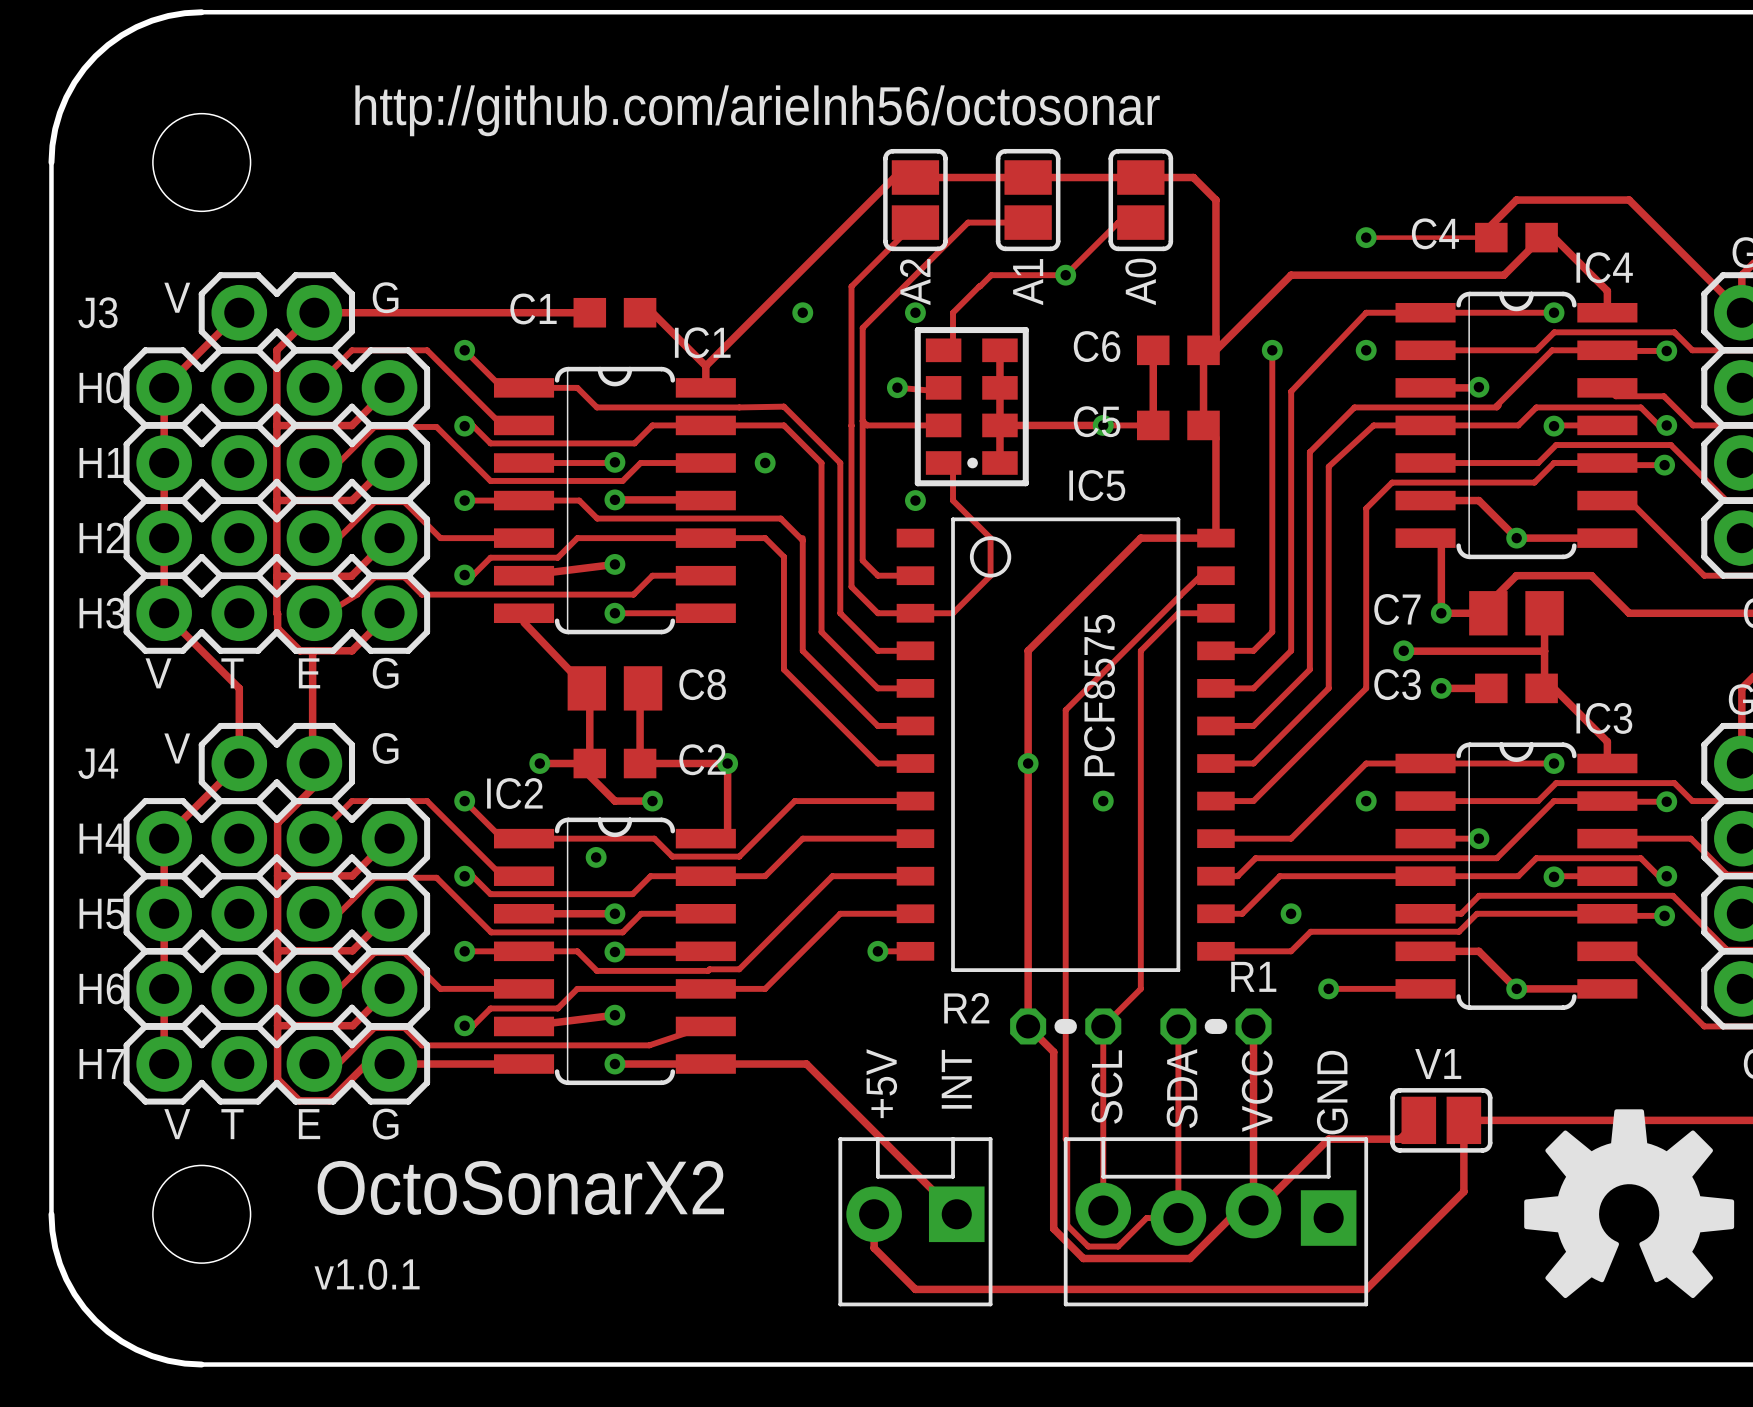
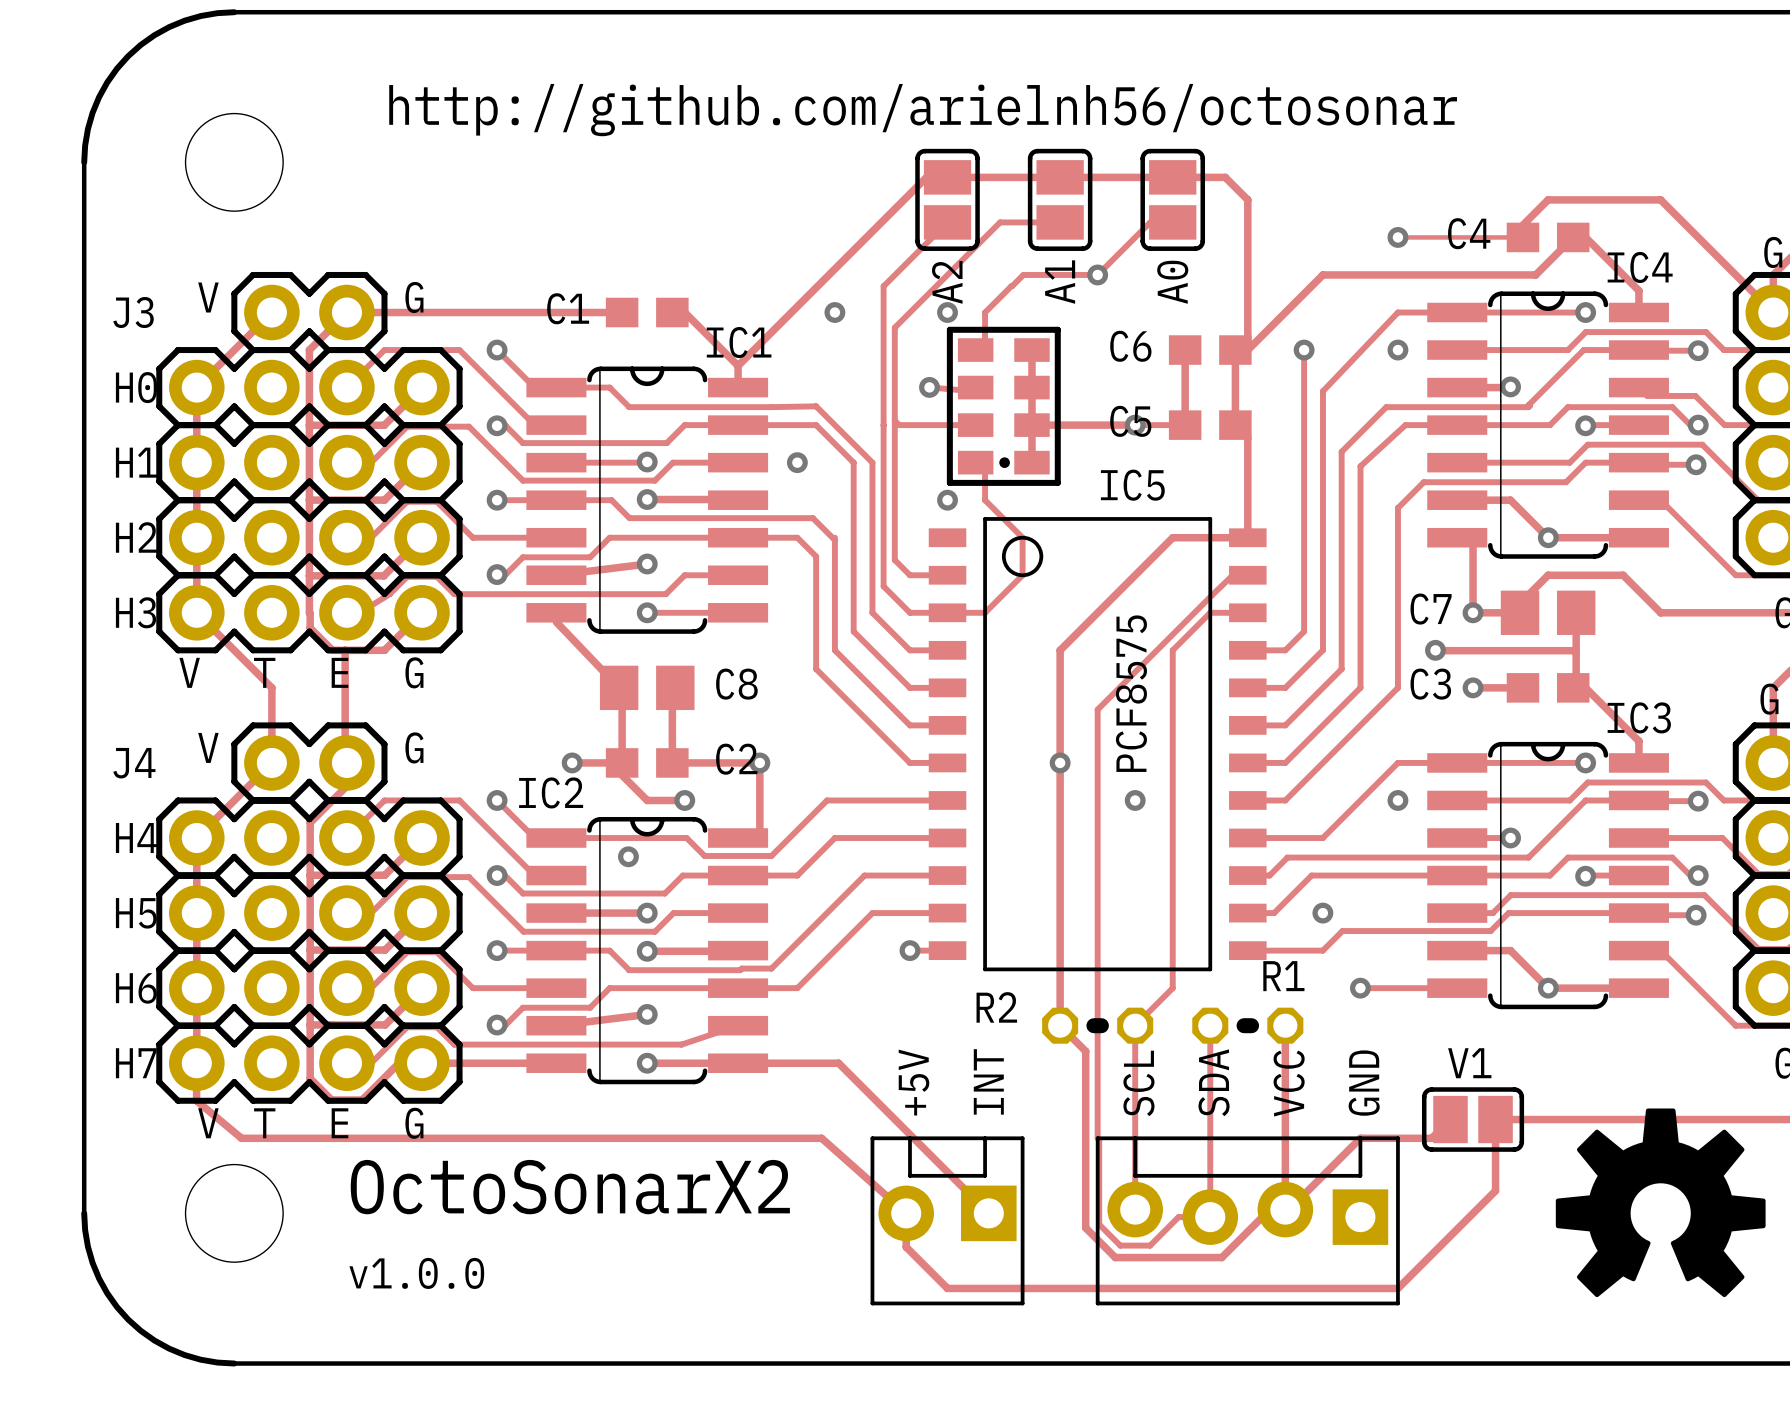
track: none -> (196, 1063) (196, 1100) (241, 1138) (821, 1138) (906, 1213)
text: v1.0.1 (367, 1274) -> v1.0.0 (416, 1273)

